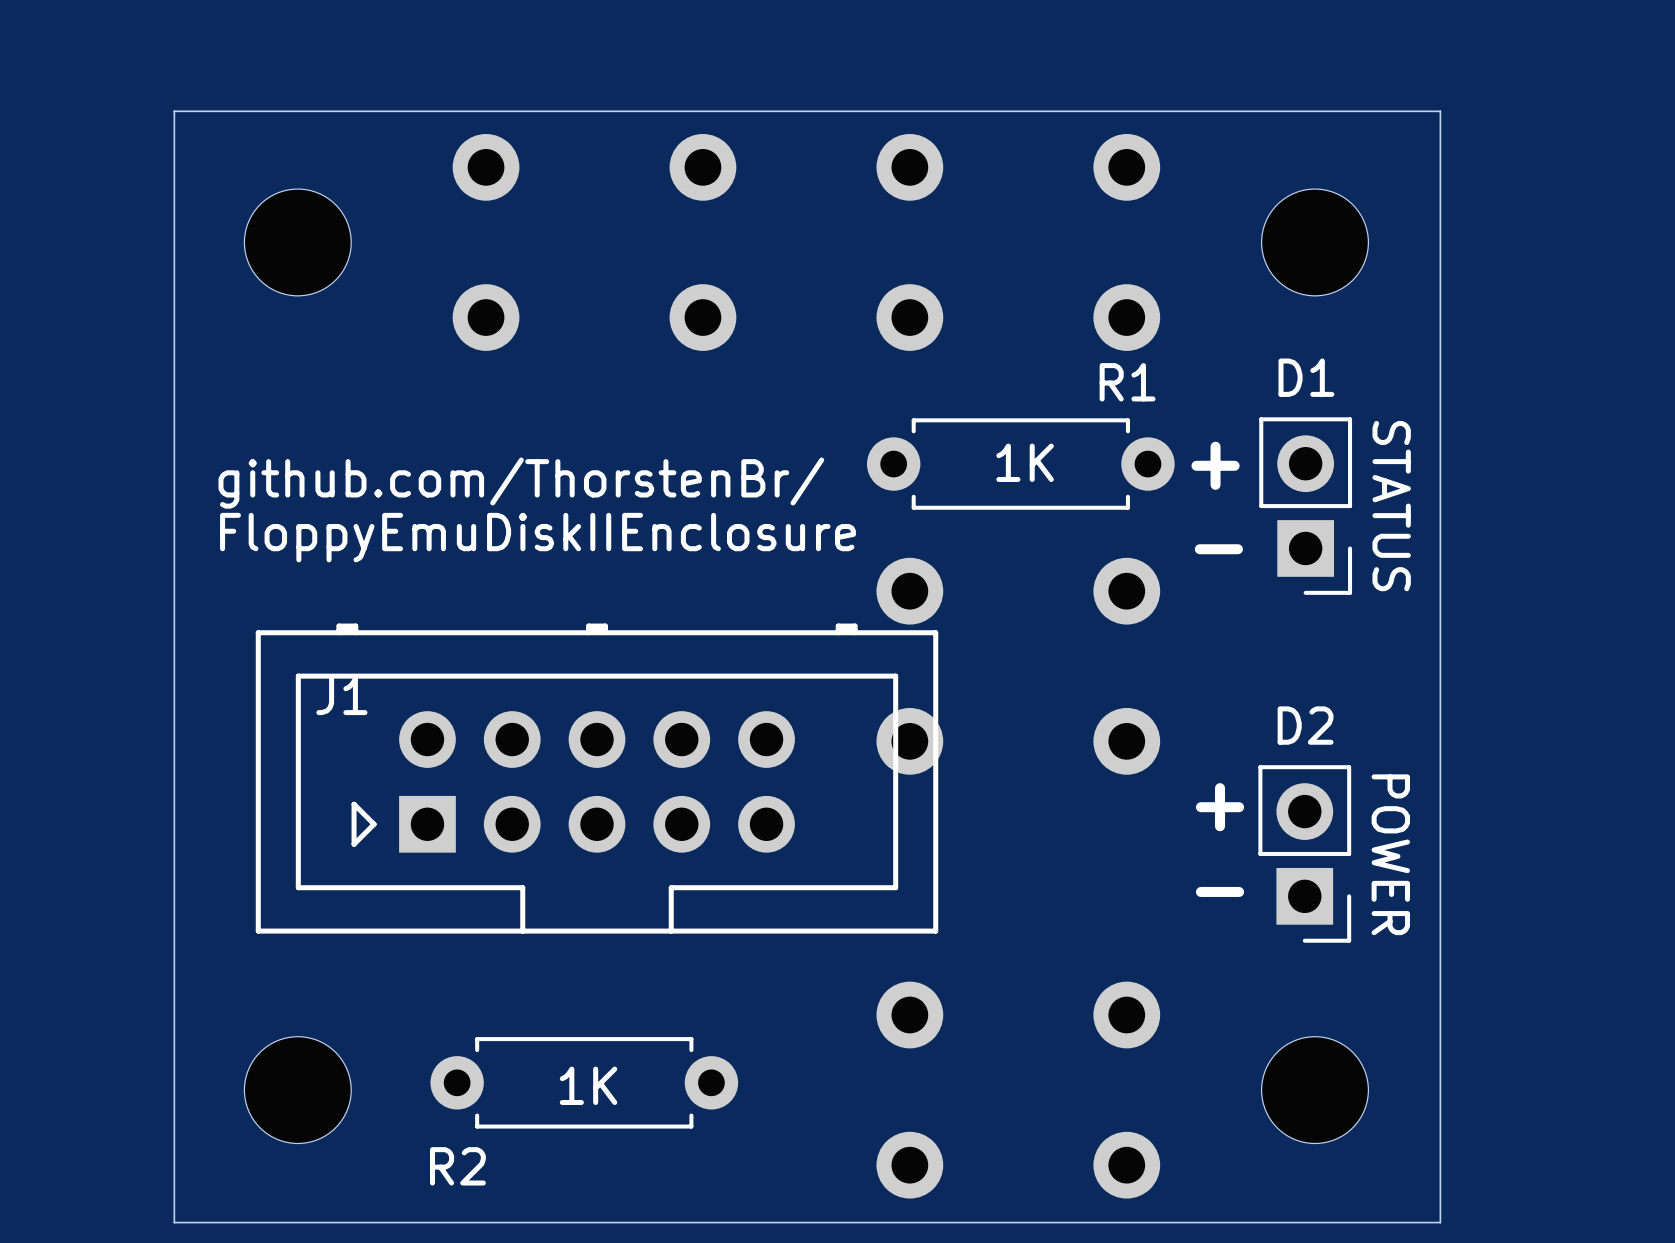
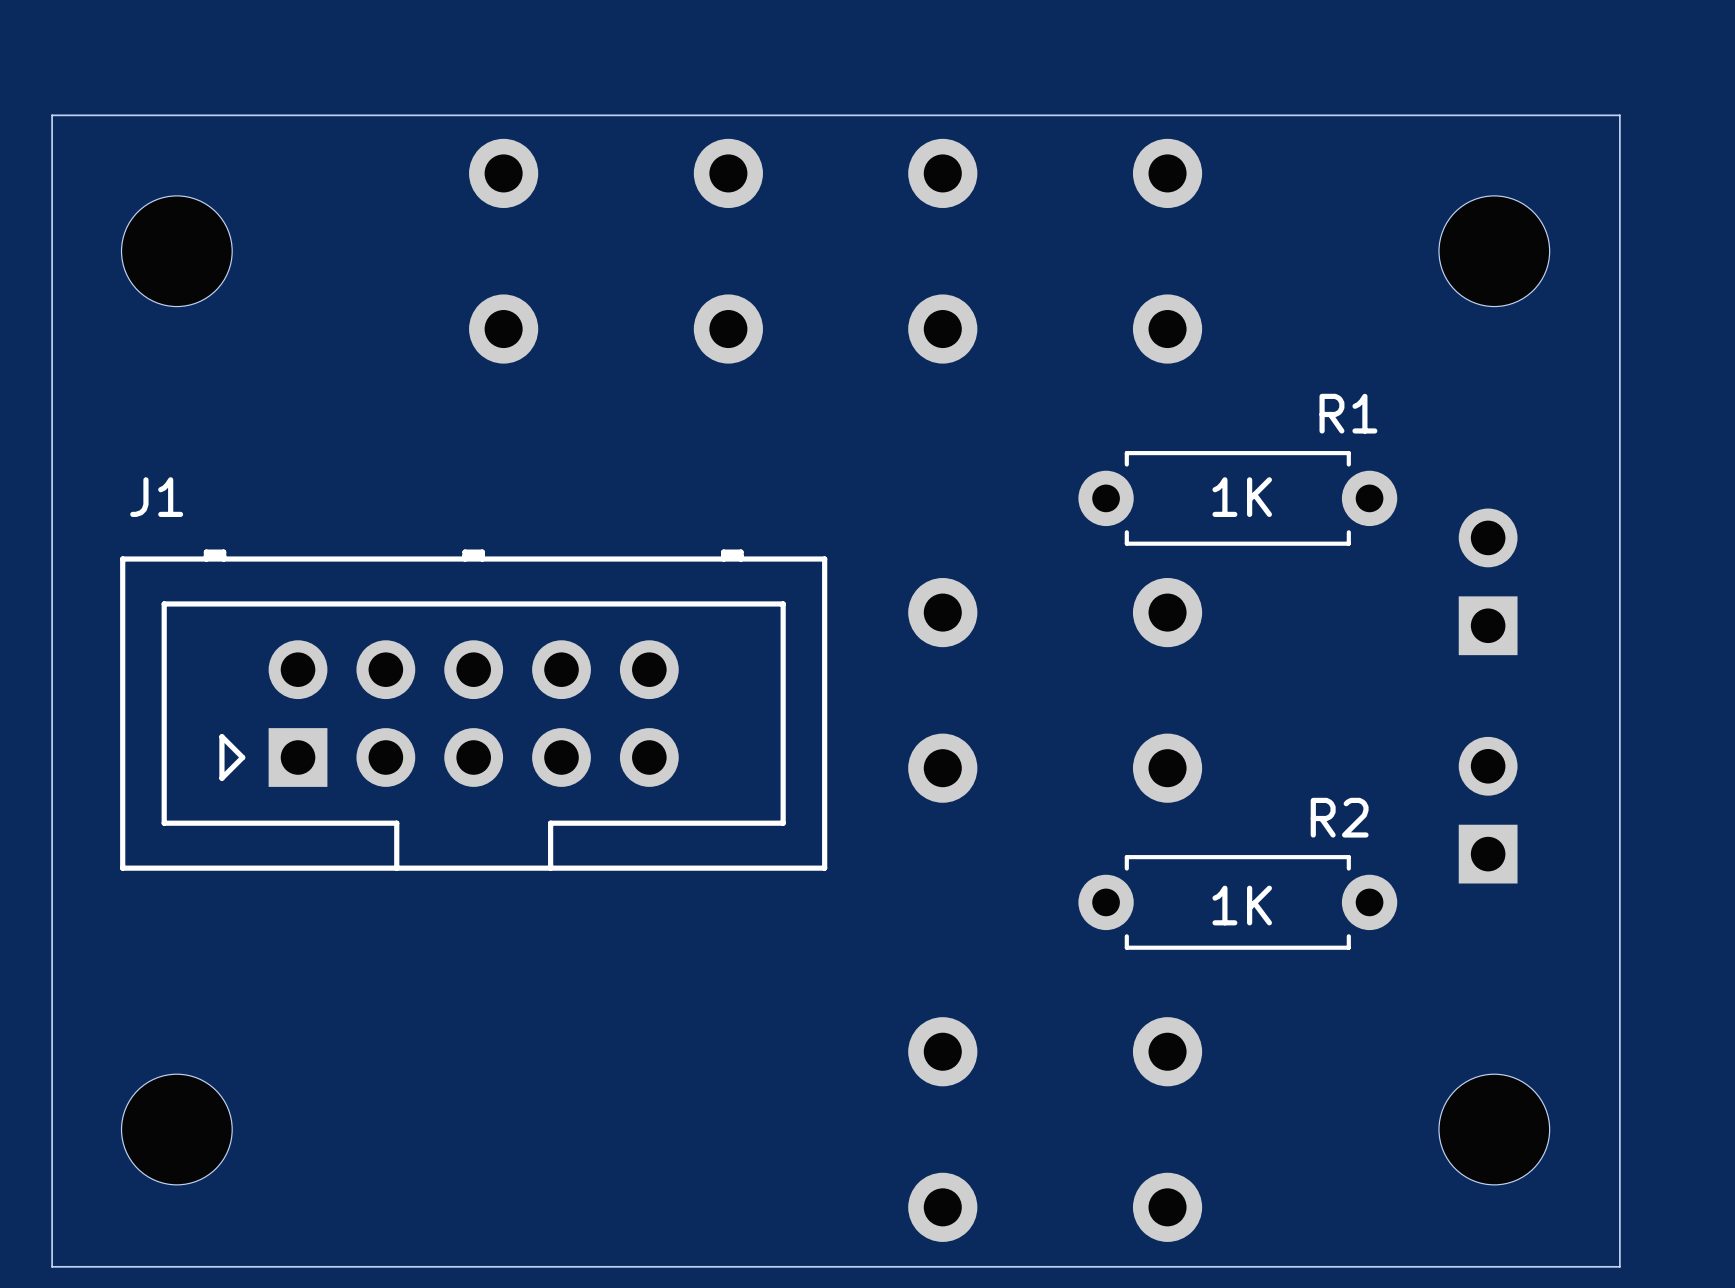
board edge: (174, 111) (174, 1222) -> (180, 115) (52, 115) (52, 1266) (180, 1266)
board edge: (1440, 111) (1440, 1222) -> (1492, 115) (1619, 115) (1619, 1266) (1492, 1266)
part position: (297, 242) -> (176, 251)
part position: (1314, 242) -> (1494, 251)
R1 position: (1020, 464) -> (1237, 498)
text: + (1215, 465) -> none
text: github.com/ThorstenBr/ (521, 483) -> none
D1 side: bottom (1305, 506) -> top (1488, 581)
text: FloppyEmuDiskIIEnclosure (538, 537) -> none
text: - (1218, 549) -> none
J1 name position: J1 (341, 695) -> J1 (156, 497)
J1 position: (597, 778) -> (473, 710)
text: + (1220, 807) -> none
D2 side: bottom (1304, 853) -> top (1488, 810)
text: - (1220, 891) -> none
R2 position: (584, 1082) -> (1237, 902)
part position: (297, 1090) -> (176, 1129)
part position: (1314, 1090) -> (1494, 1129)
R2 name position: R2 (457, 1166) -> R2 (1339, 817)

